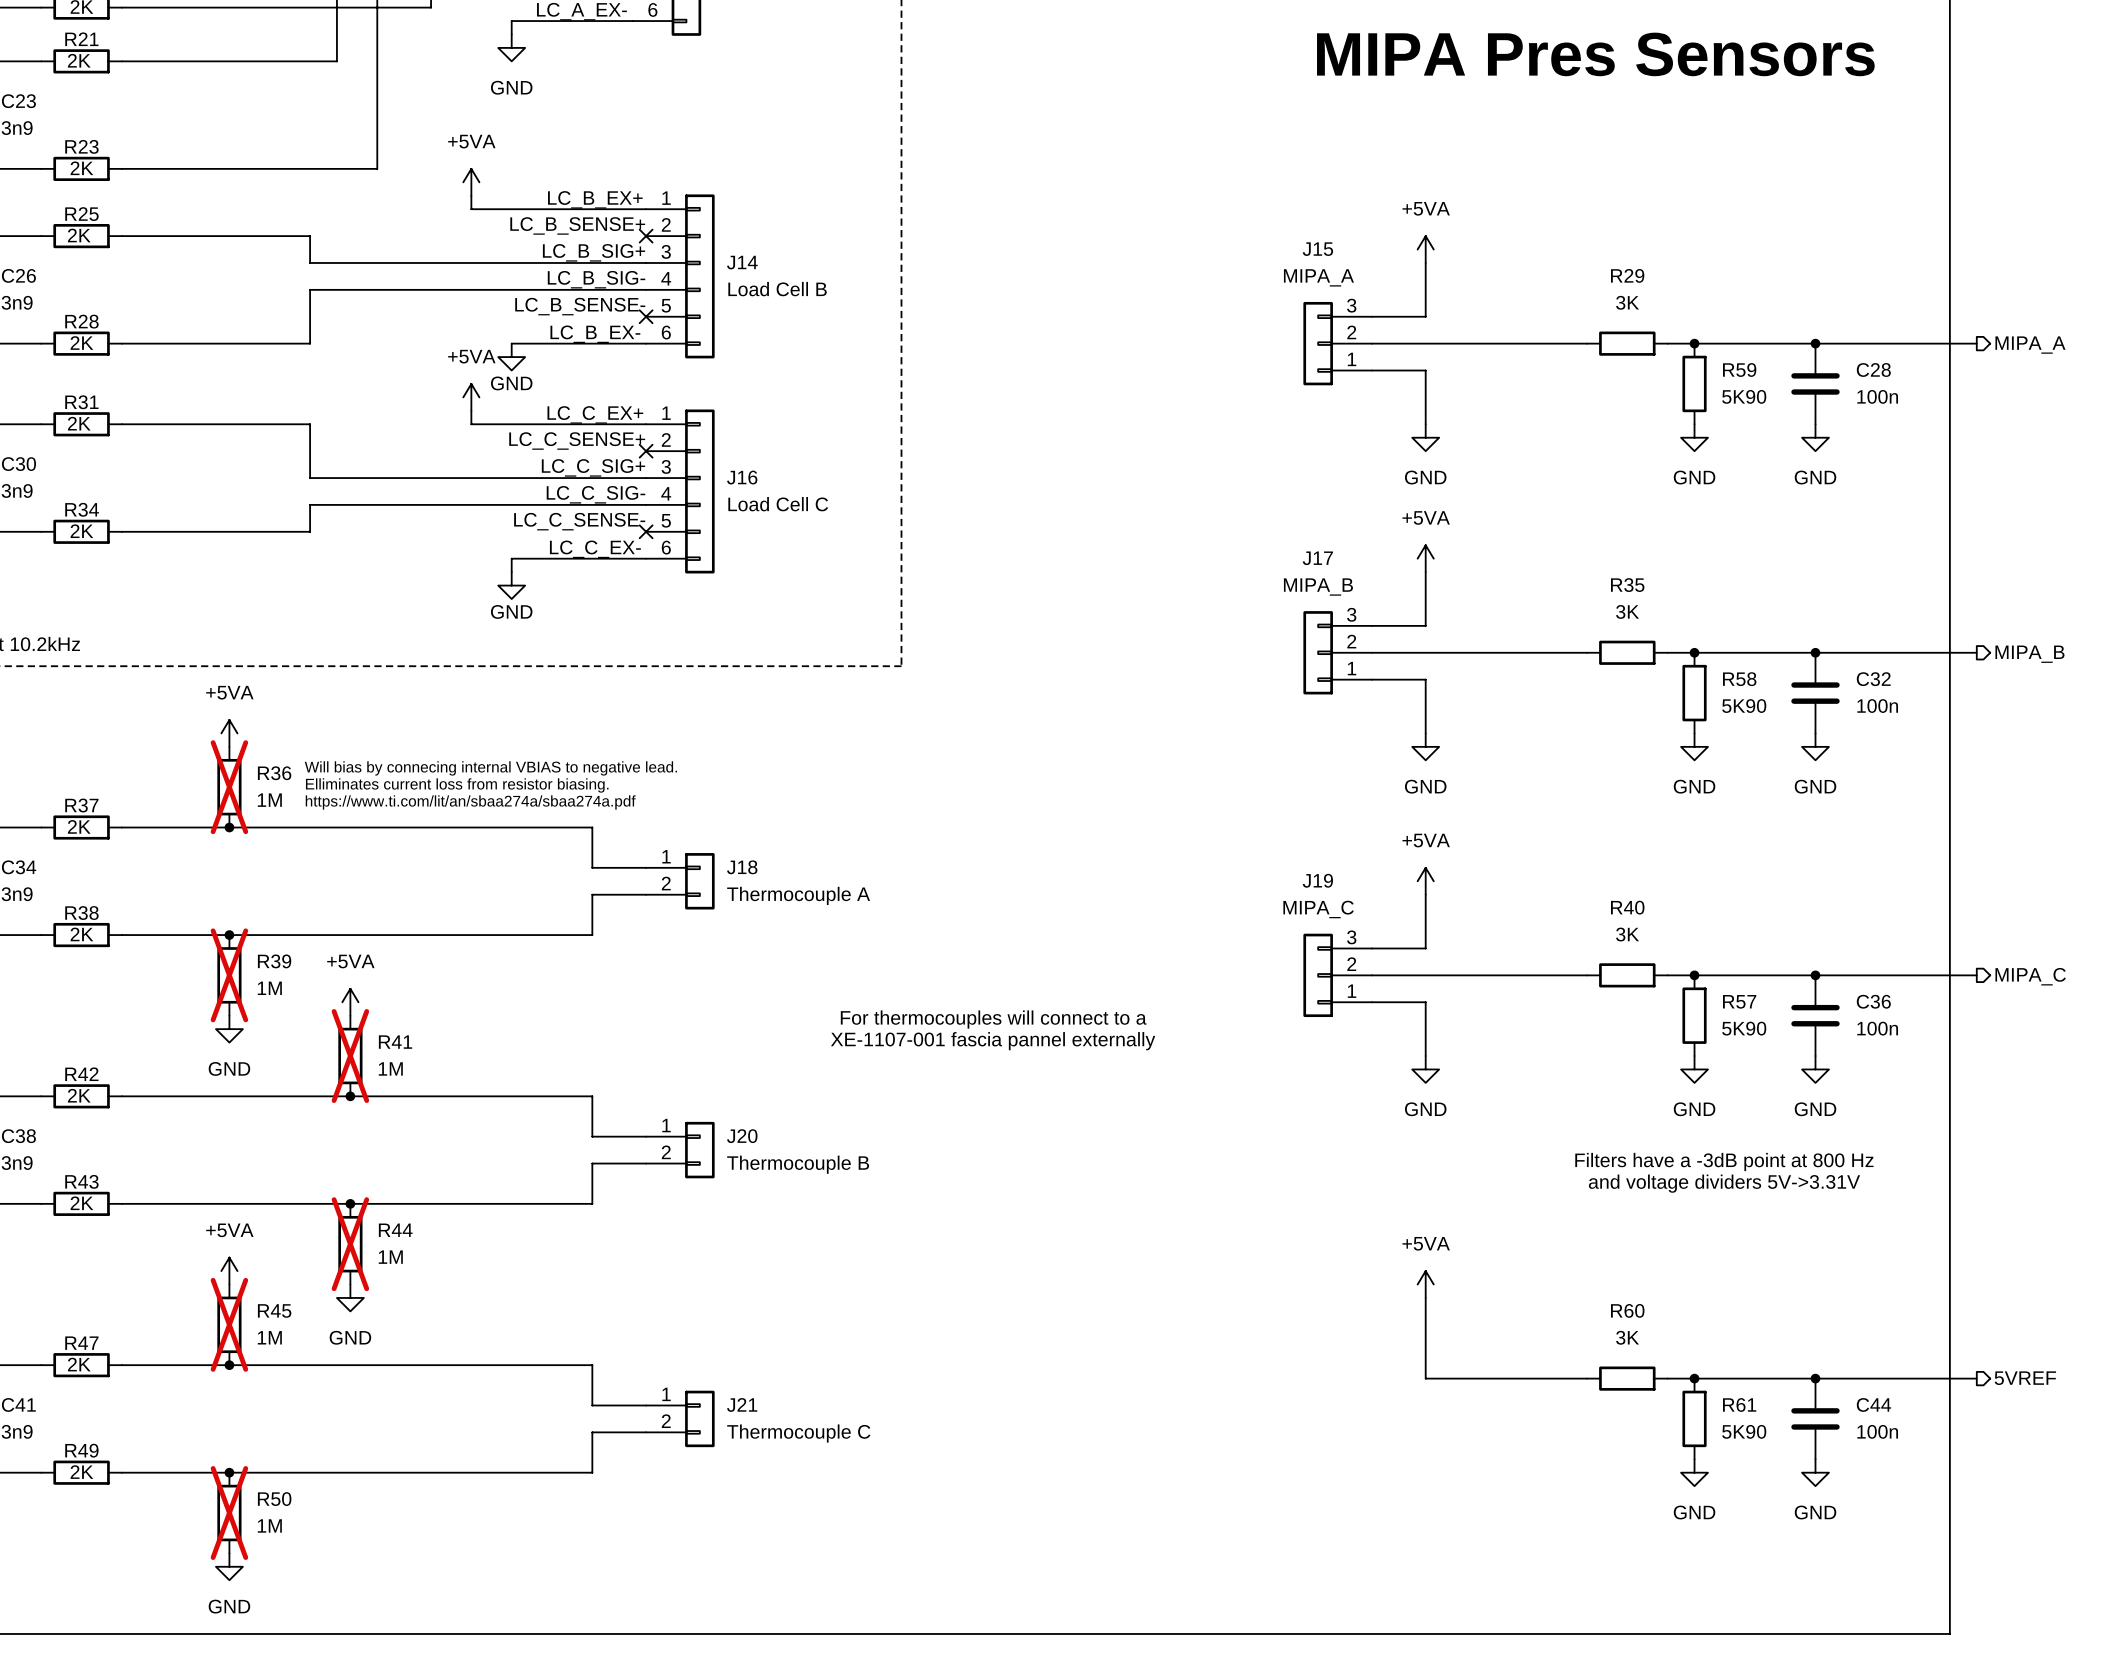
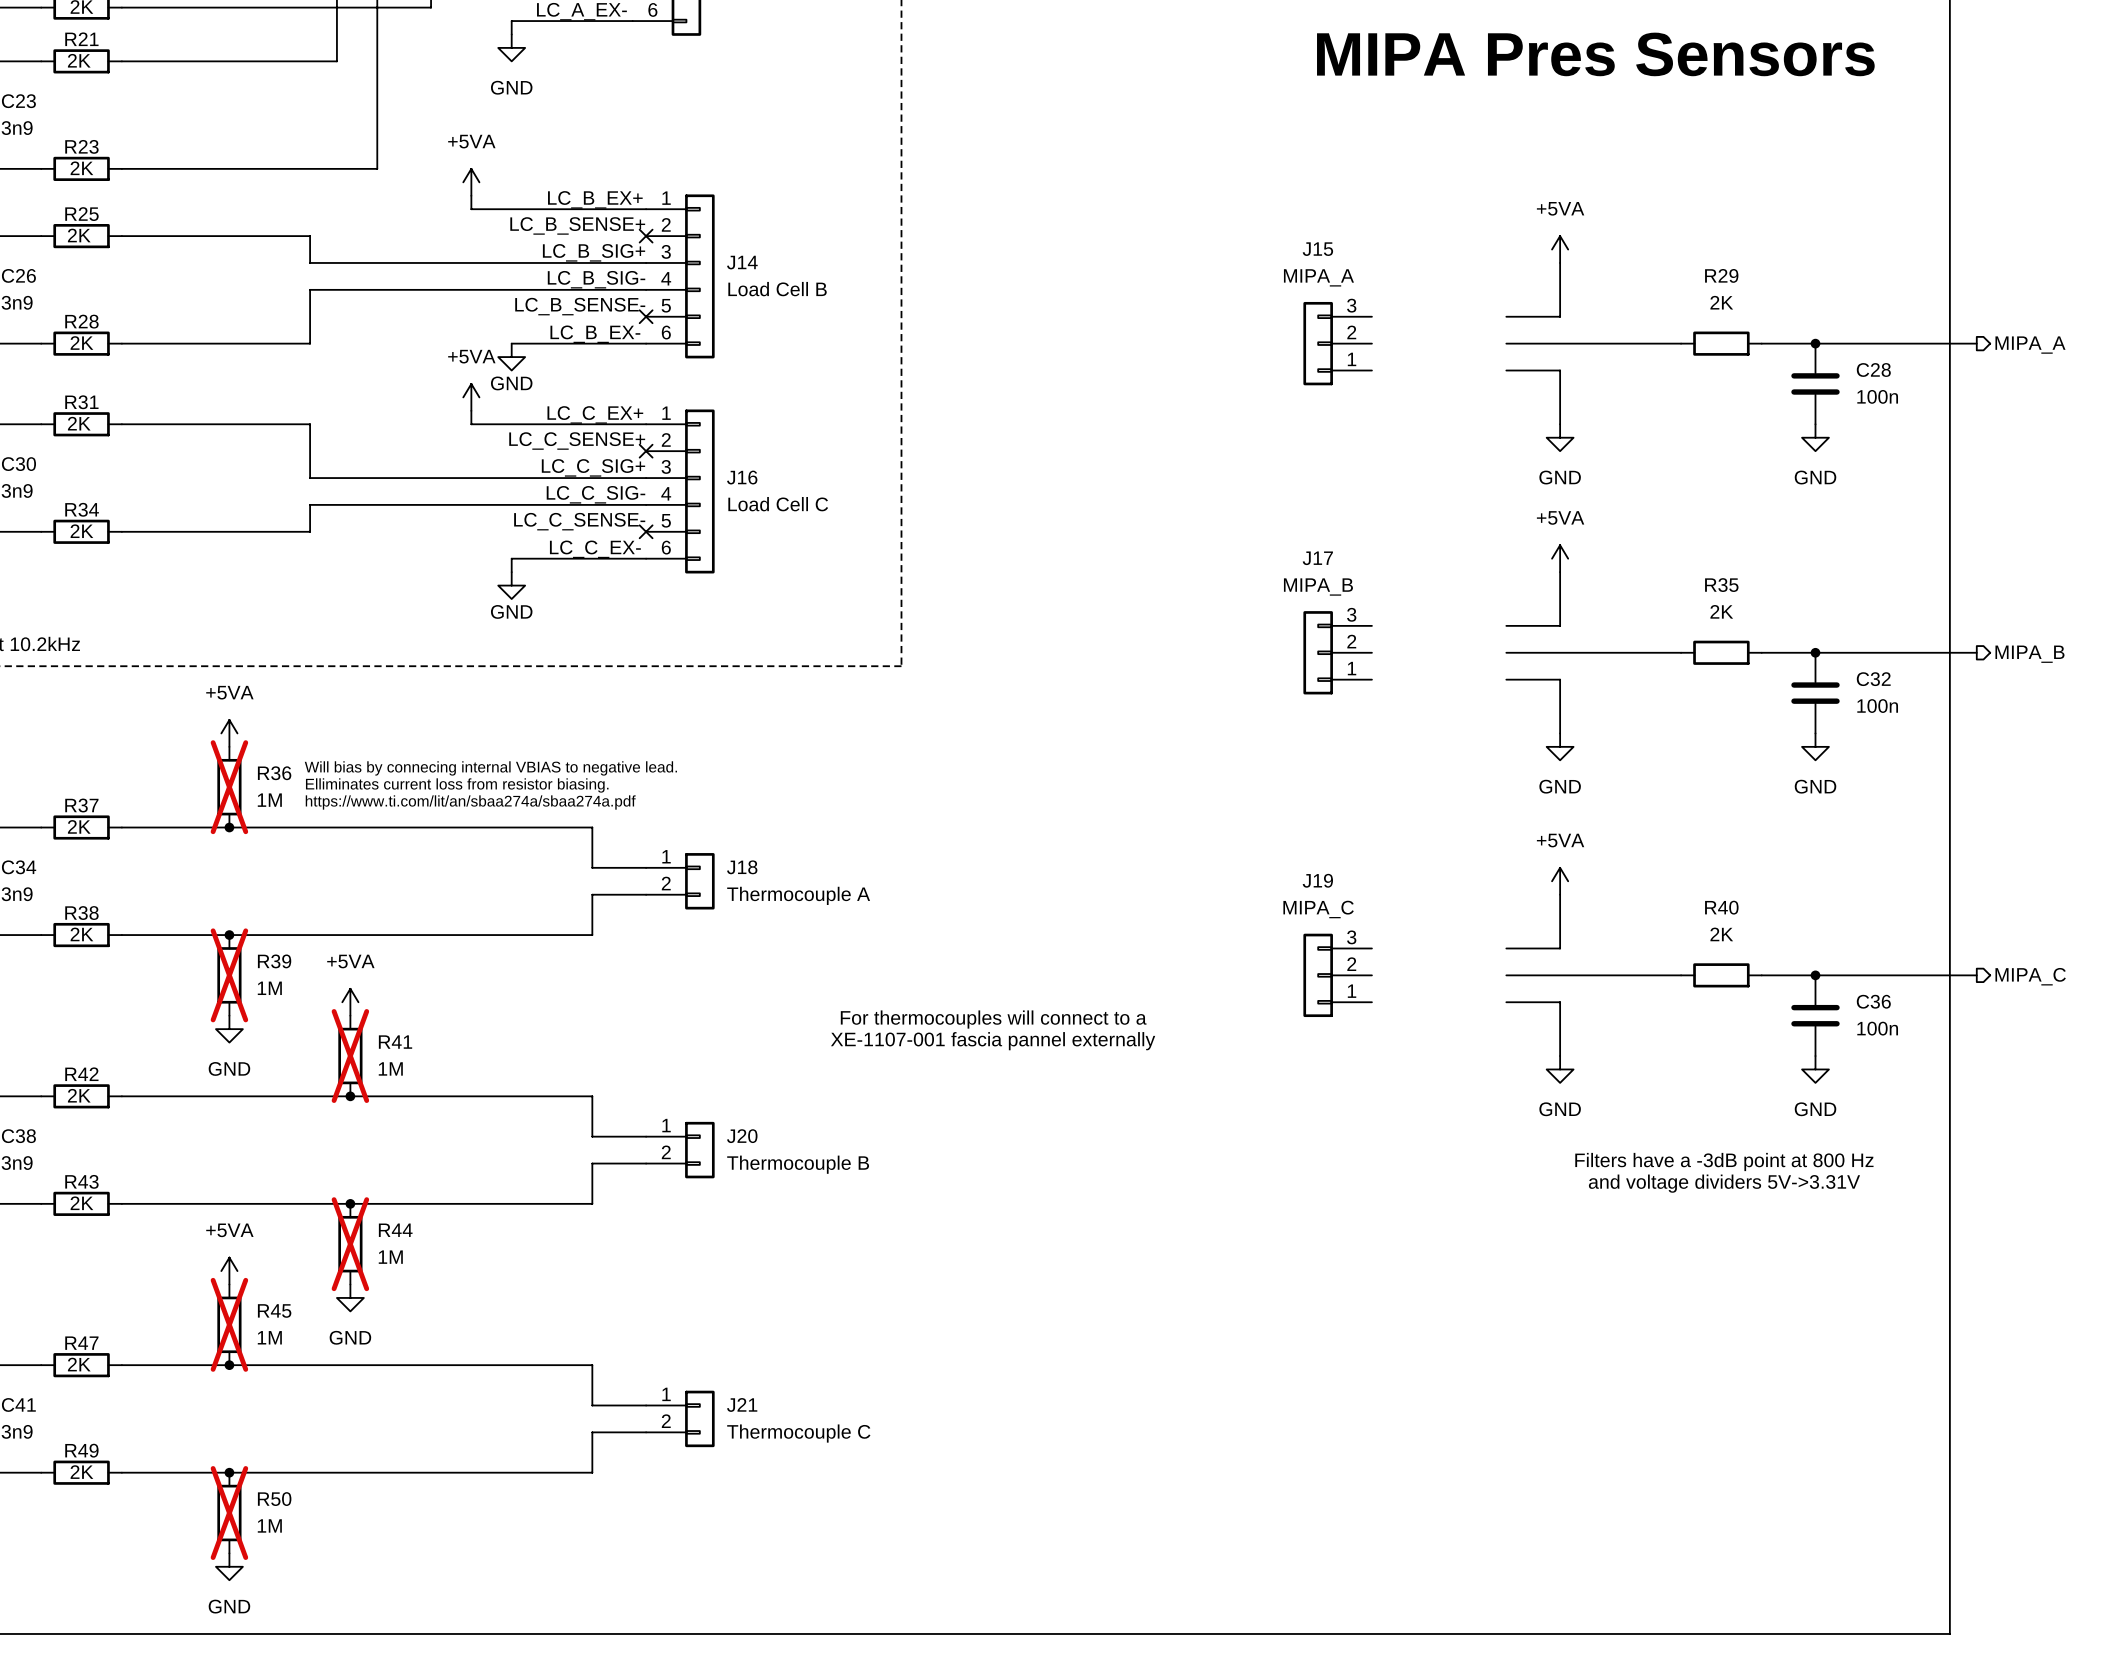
power symbol position: +5VA (1425, 249) -> +5VA (1560, 249)
wire: (1425, 262) (1425, 316) (1371, 316) -> (1560, 262) (1560, 316) (1506, 316)
R29 value: 3K (1627, 302) -> 2K (1721, 302)
wire: (1371, 343) (1506, 343) -> none
R29 position: (1627, 343) -> (1721, 343)
wire: (1681, 343) (1761, 343) -> (1586, 343) (1667, 343)
junction: (1694, 343) -> none
wire: (1371, 370) (1425, 370) (1425, 424) -> (1506, 370) (1560, 370) (1560, 424)
R59: 5K90 (1694, 383) -> none
power symbol: GND (1425, 437) -> none
power symbol: none -> GND (1560, 437)
power symbol: GND (1694, 437) -> none
power symbol position: +5VA (1425, 558) -> +5VA (1560, 558)
wire: (1425, 572) (1425, 625) (1371, 625) -> (1560, 572) (1560, 625) (1506, 625)
R35 value: 3K (1627, 611) -> 2K (1721, 611)
wire: (1371, 652) (1506, 652) -> none
R35 position: (1627, 652) -> (1721, 652)
wire: (1681, 652) (1761, 652) -> (1586, 652) (1667, 652)
junction: (1694, 652) -> none
wire: (1371, 679) (1425, 679) (1425, 733) -> (1506, 679) (1560, 679) (1560, 733)
R58: 5K90 (1694, 693) -> none
power symbol: GND (1425, 746) -> none
power symbol: none -> GND (1560, 746)
power symbol: GND (1694, 746) -> none
power symbol position: +5VA (1425, 881) -> +5VA (1560, 881)
wire: (1425, 894) (1425, 948) (1371, 948) -> (1560, 894) (1560, 948) (1506, 948)
R40 value: 3K (1627, 934) -> 2K (1721, 934)
wire: (1371, 975) (1506, 975) -> none
R40 position: (1627, 975) -> (1721, 975)
wire: (1681, 975) (1761, 975) -> (1586, 975) (1667, 975)
junction: (1694, 975) -> none
wire: (1371, 1002) (1425, 1002) (1425, 1056) -> (1506, 1002) (1560, 1002) (1560, 1056)
R57: 5K90 (1694, 1015) -> none
power symbol: GND (1425, 1069) -> none
power symbol: none -> GND (1560, 1069)
power symbol: GND (1694, 1069) -> none
power symbol: +5VA (1425, 1284) -> none
wire: (1425, 1297) (1425, 1378) (1586, 1378) -> none
R60: 3K (1627, 1378) -> none
wire: (1667, 1378) (1976, 1378) -> none
junction: (1694, 1378) -> none
junction: (1815, 1378) -> none
hierarchical label: 5VREF (2025, 1378) -> none
R61: 5K90 (1694, 1418) -> none
C44: 100n (1815, 1418) -> none
power symbol: GND (1694, 1472) -> none
power symbol: GND (1815, 1472) -> none

